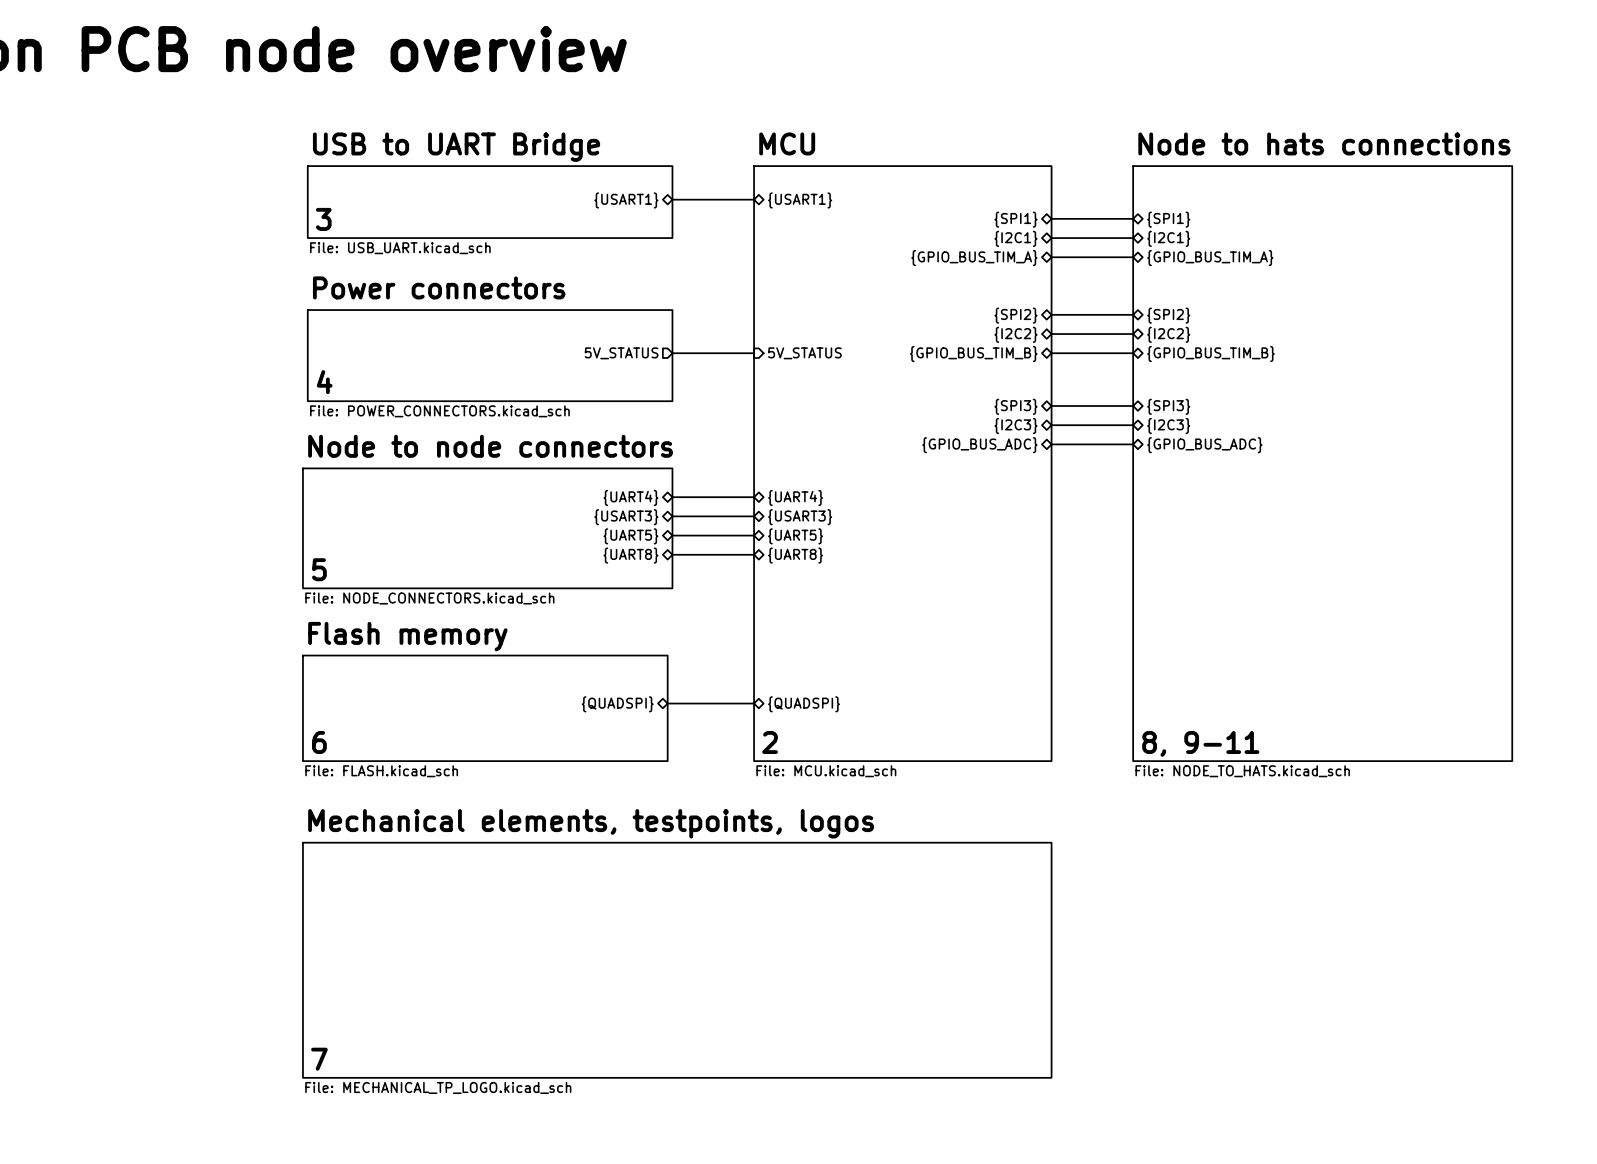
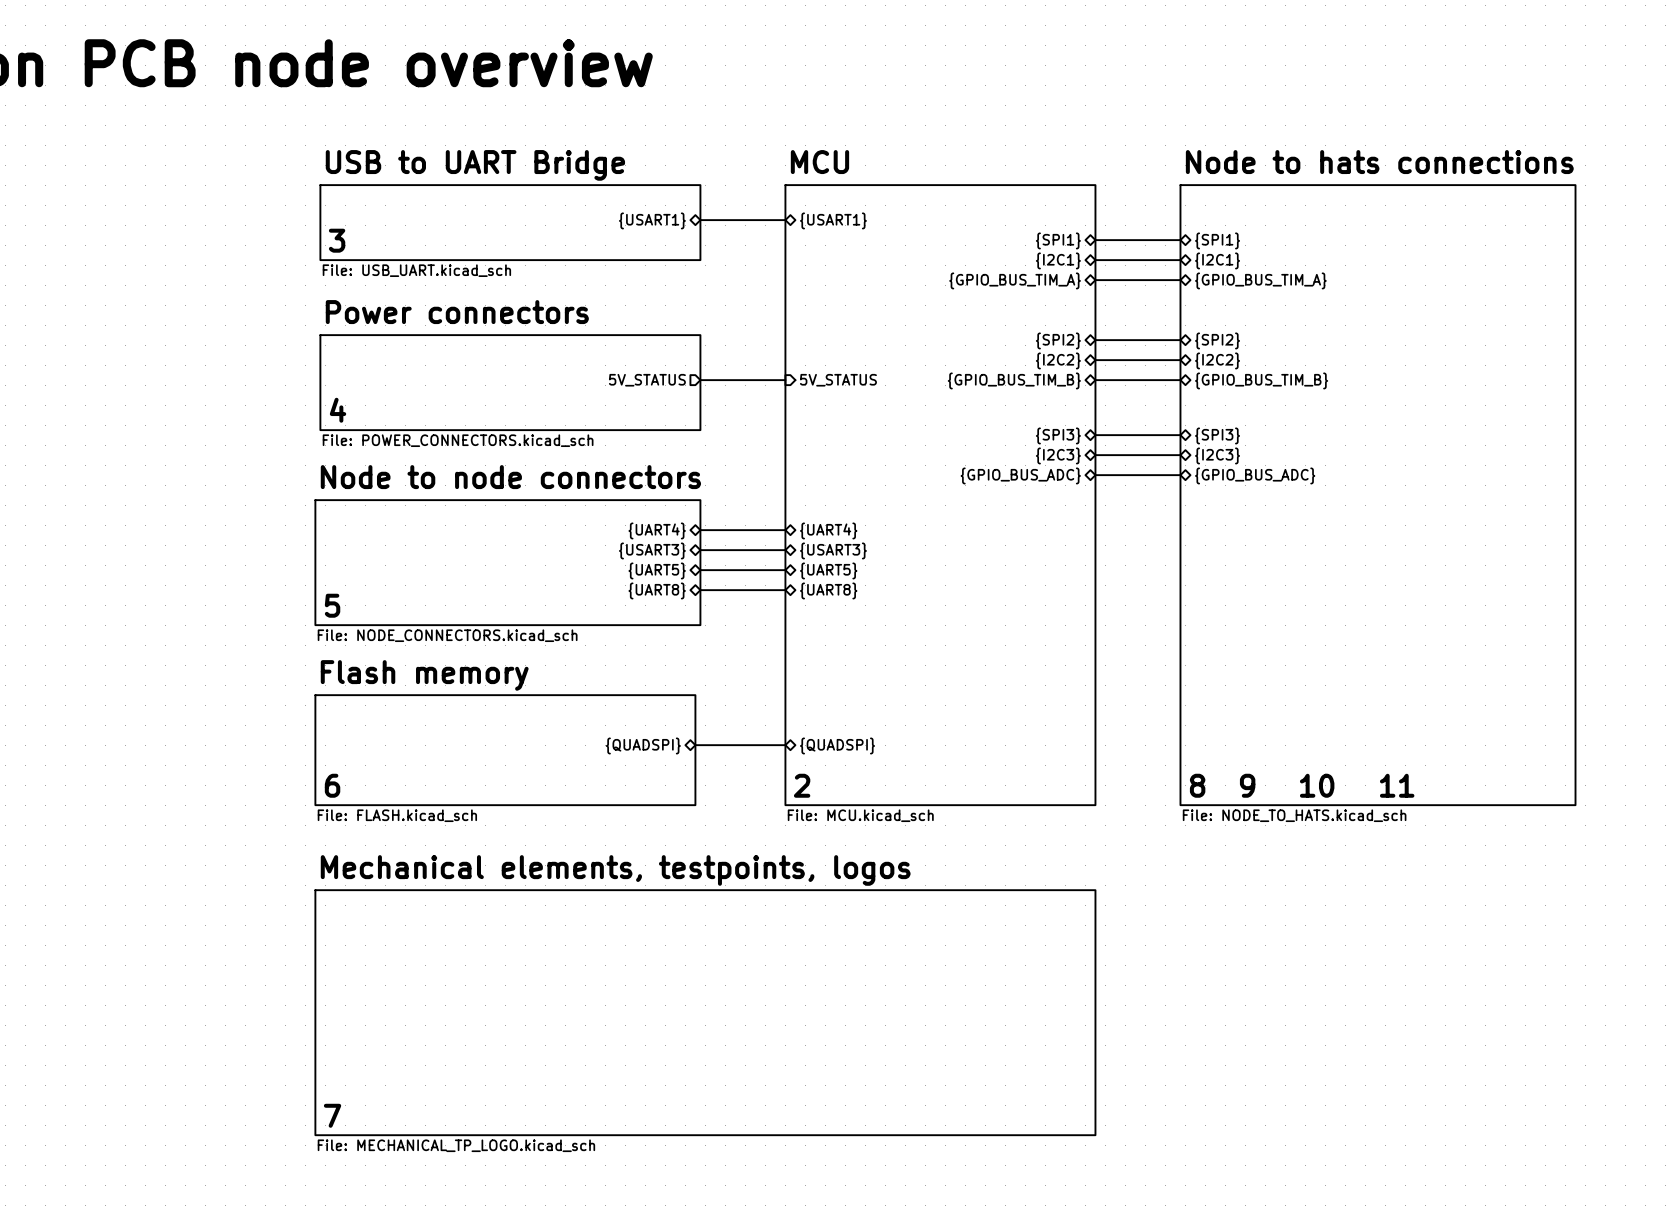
text: none -> 9 (1247, 785)
text: none -> 10 (1317, 785)
text: none -> 11 (1397, 785)
text: 8, 9-11 (1200, 743) -> 8 (1197, 785)

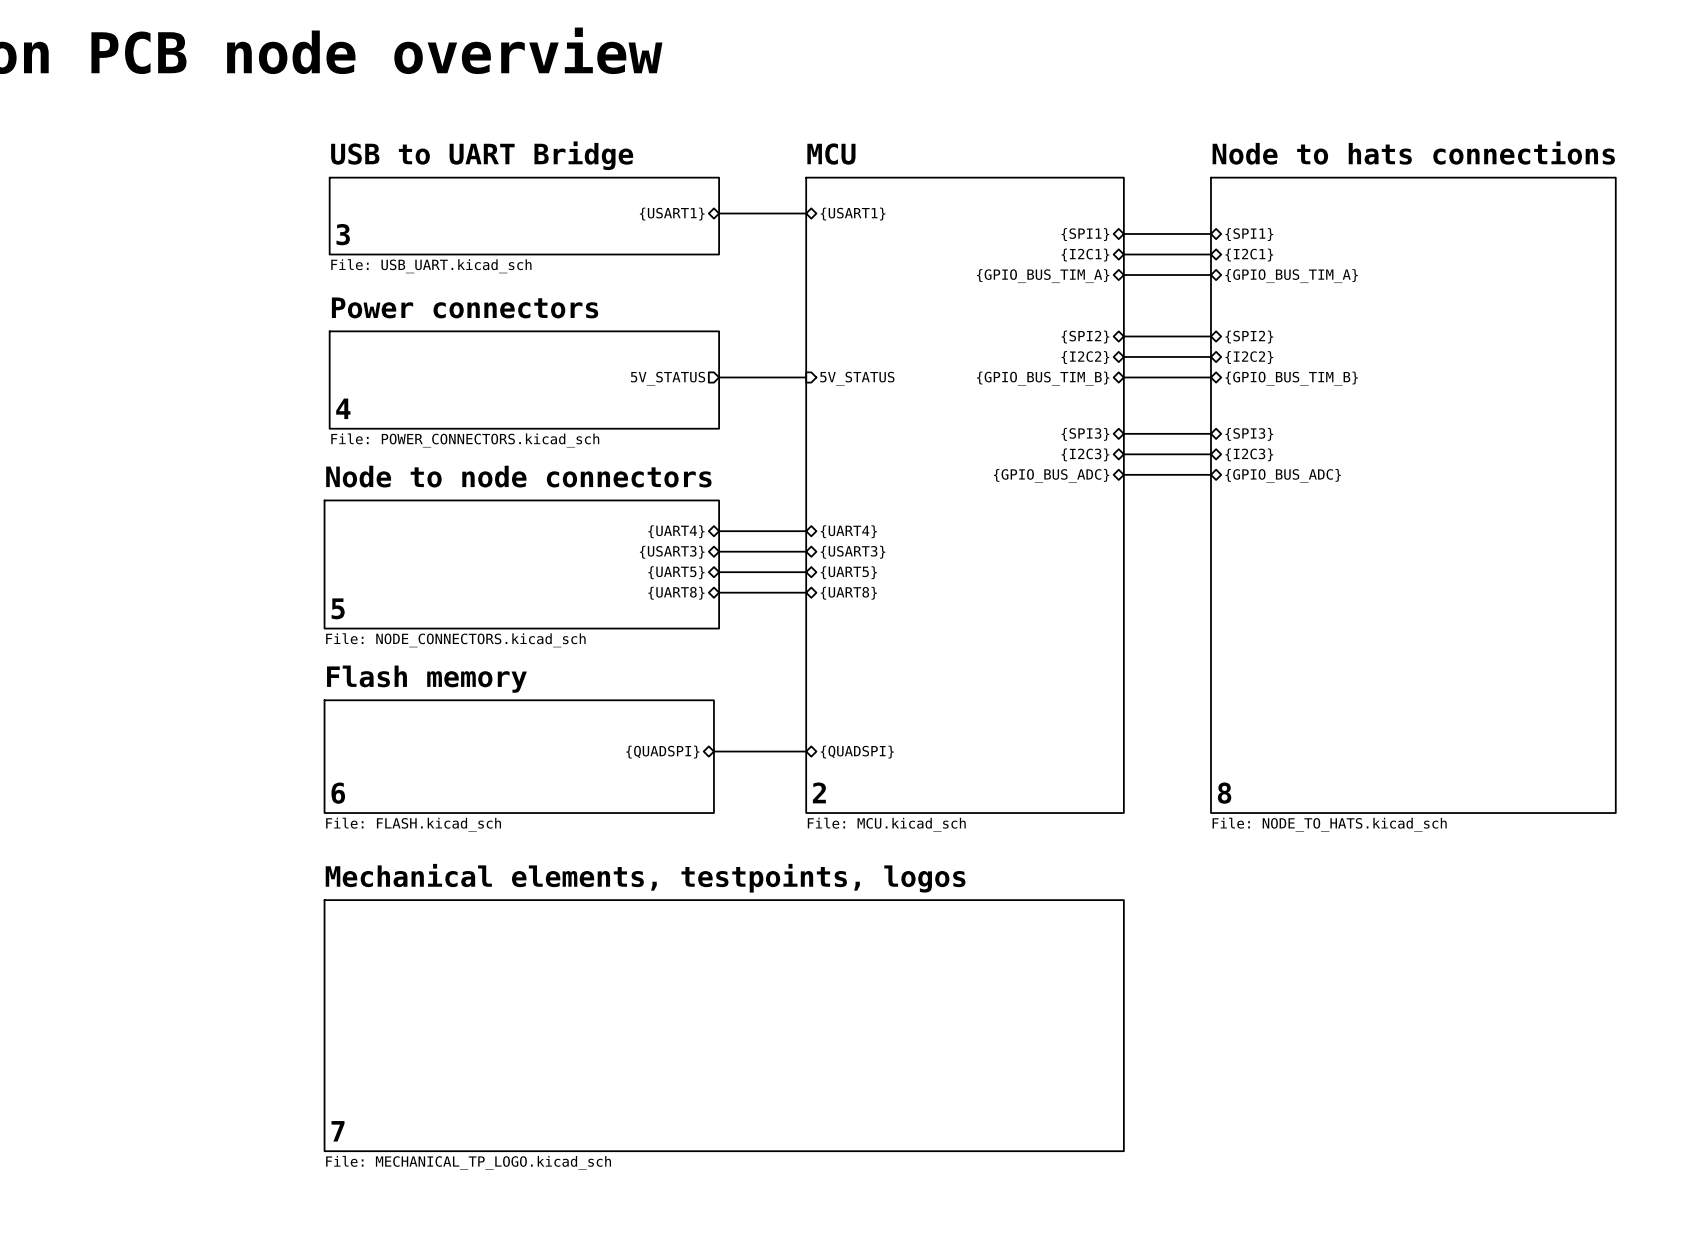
text: 9 (1247, 785) -> none
text: 10 (1317, 785) -> none
text: 11 (1397, 785) -> none

